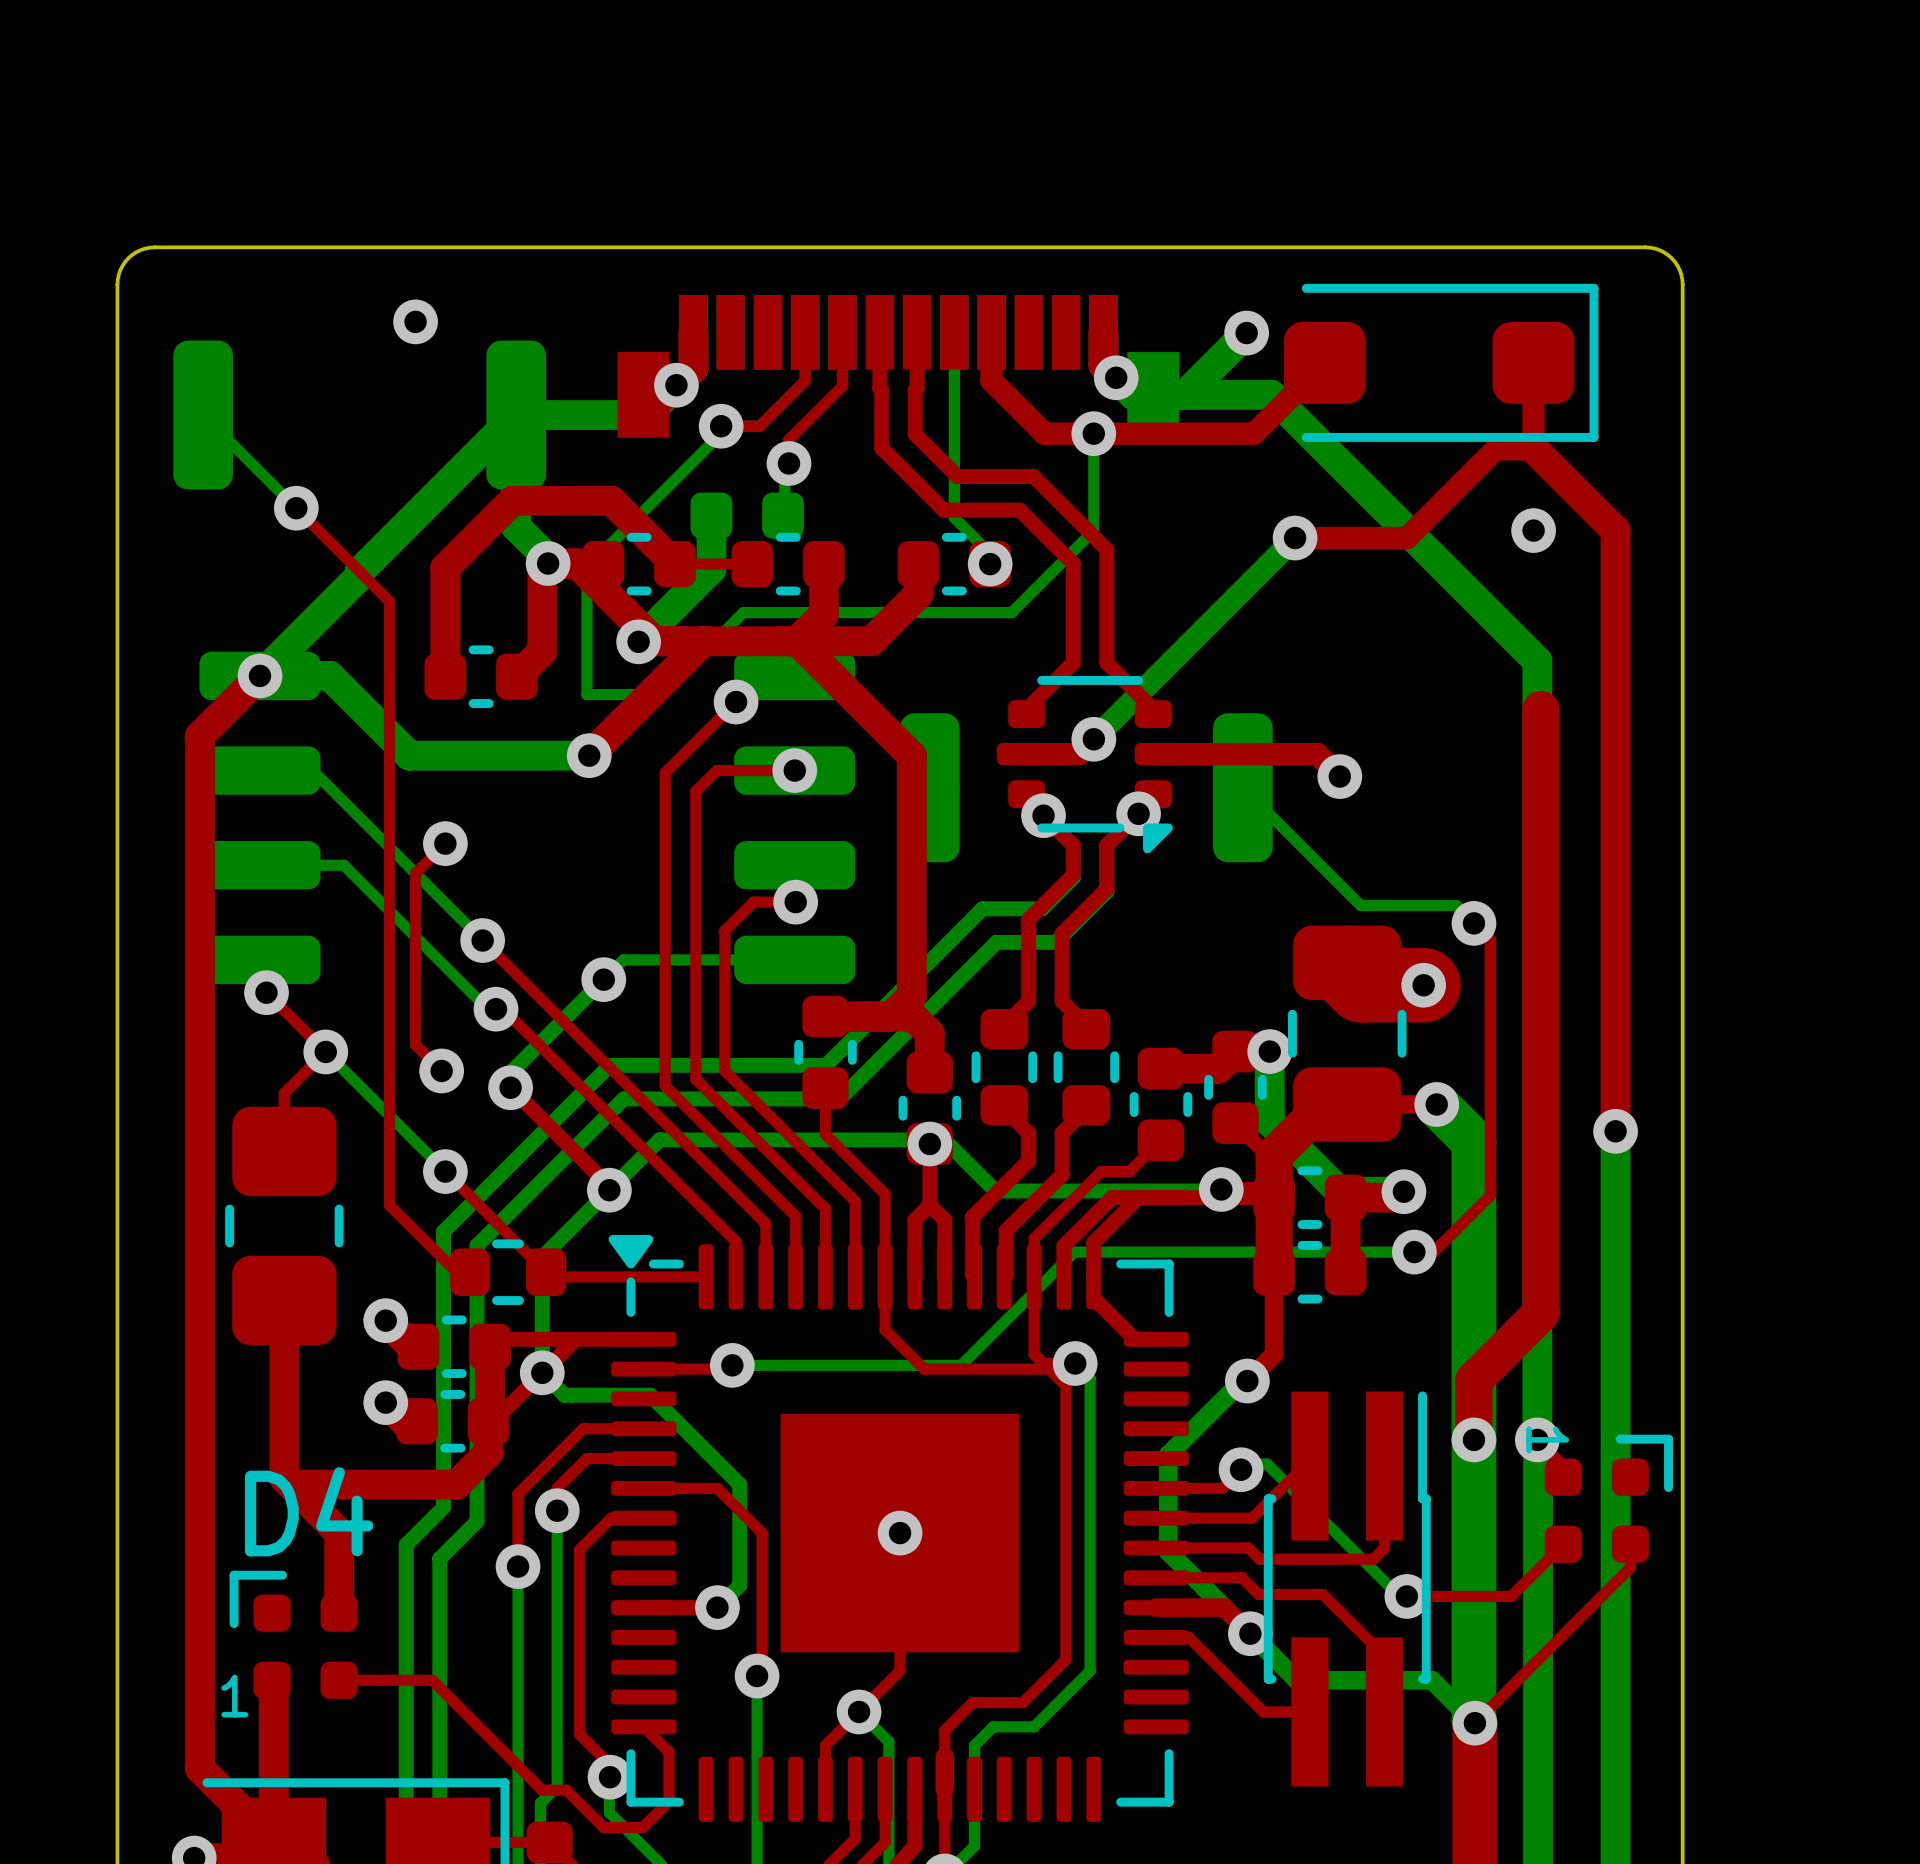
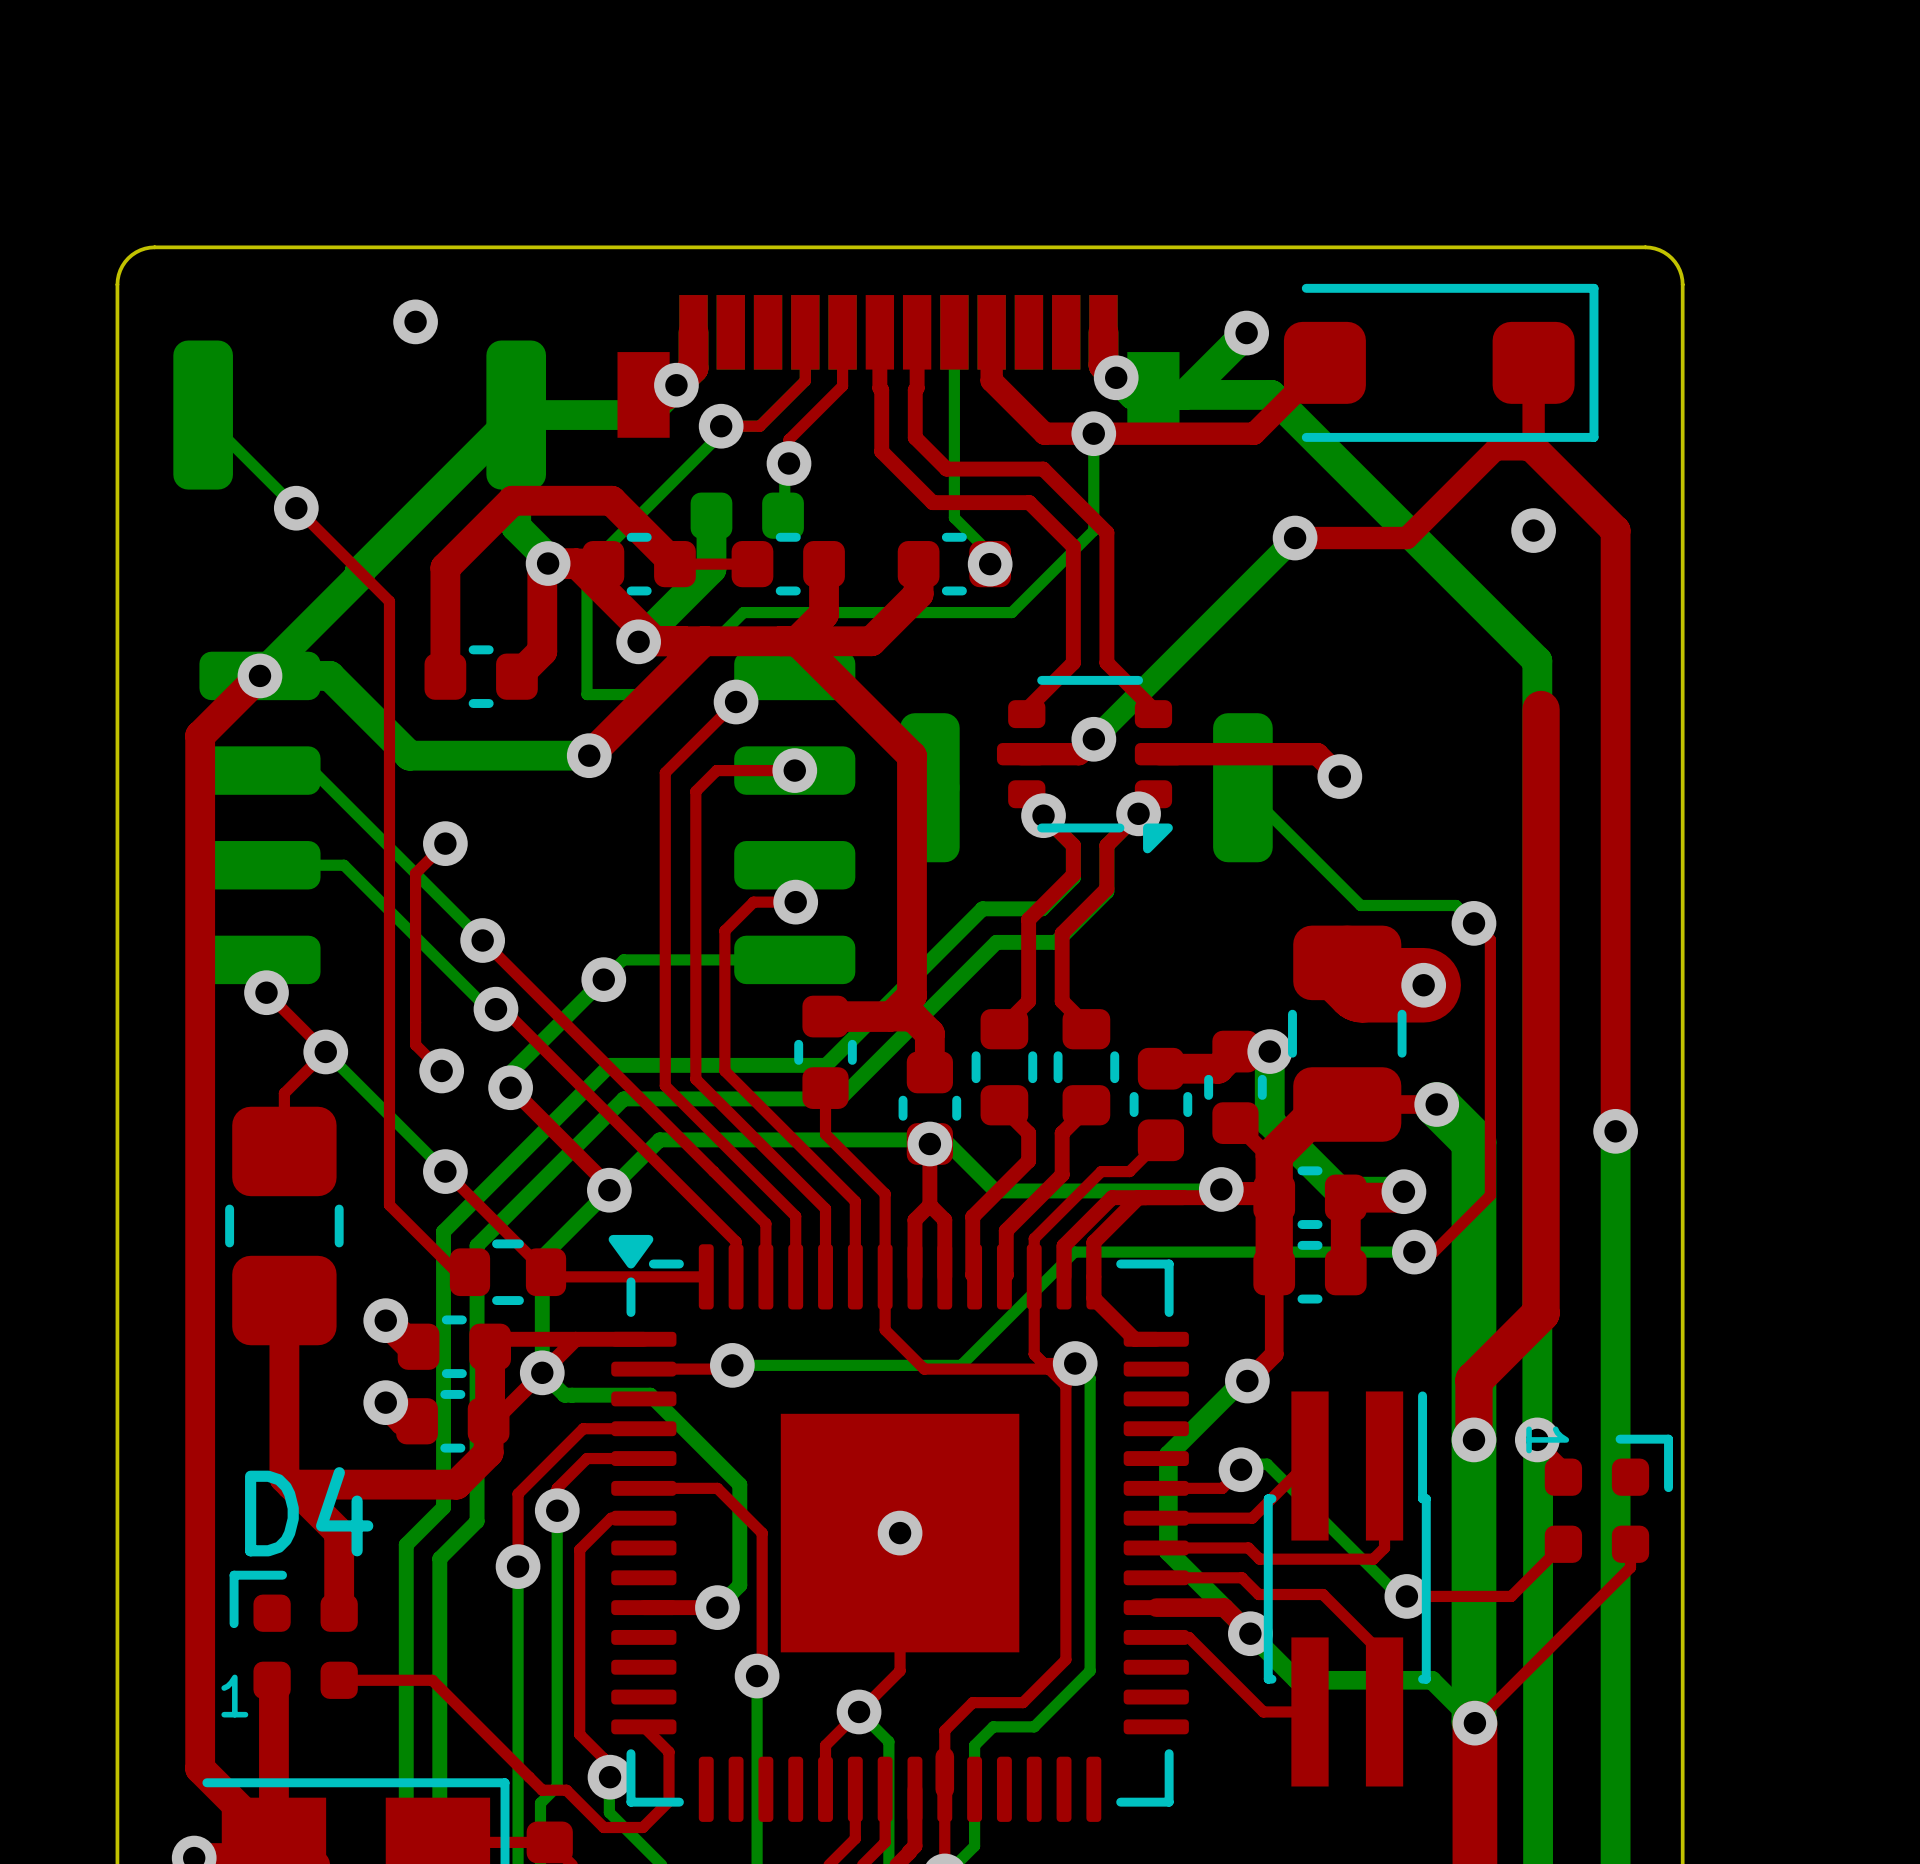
top track: (915, 434) (957, 476) (1033, 476) (1106, 549) -> (915, 434) (915, 437) (946, 469) (1043, 469) (1106, 532) (1106, 549)
top track: (881, 448) (943, 510) (1019, 510) (1073, 563) -> (881, 448) (881, 451) (932, 502) (1029, 502) (1073, 546) (1073, 563)

